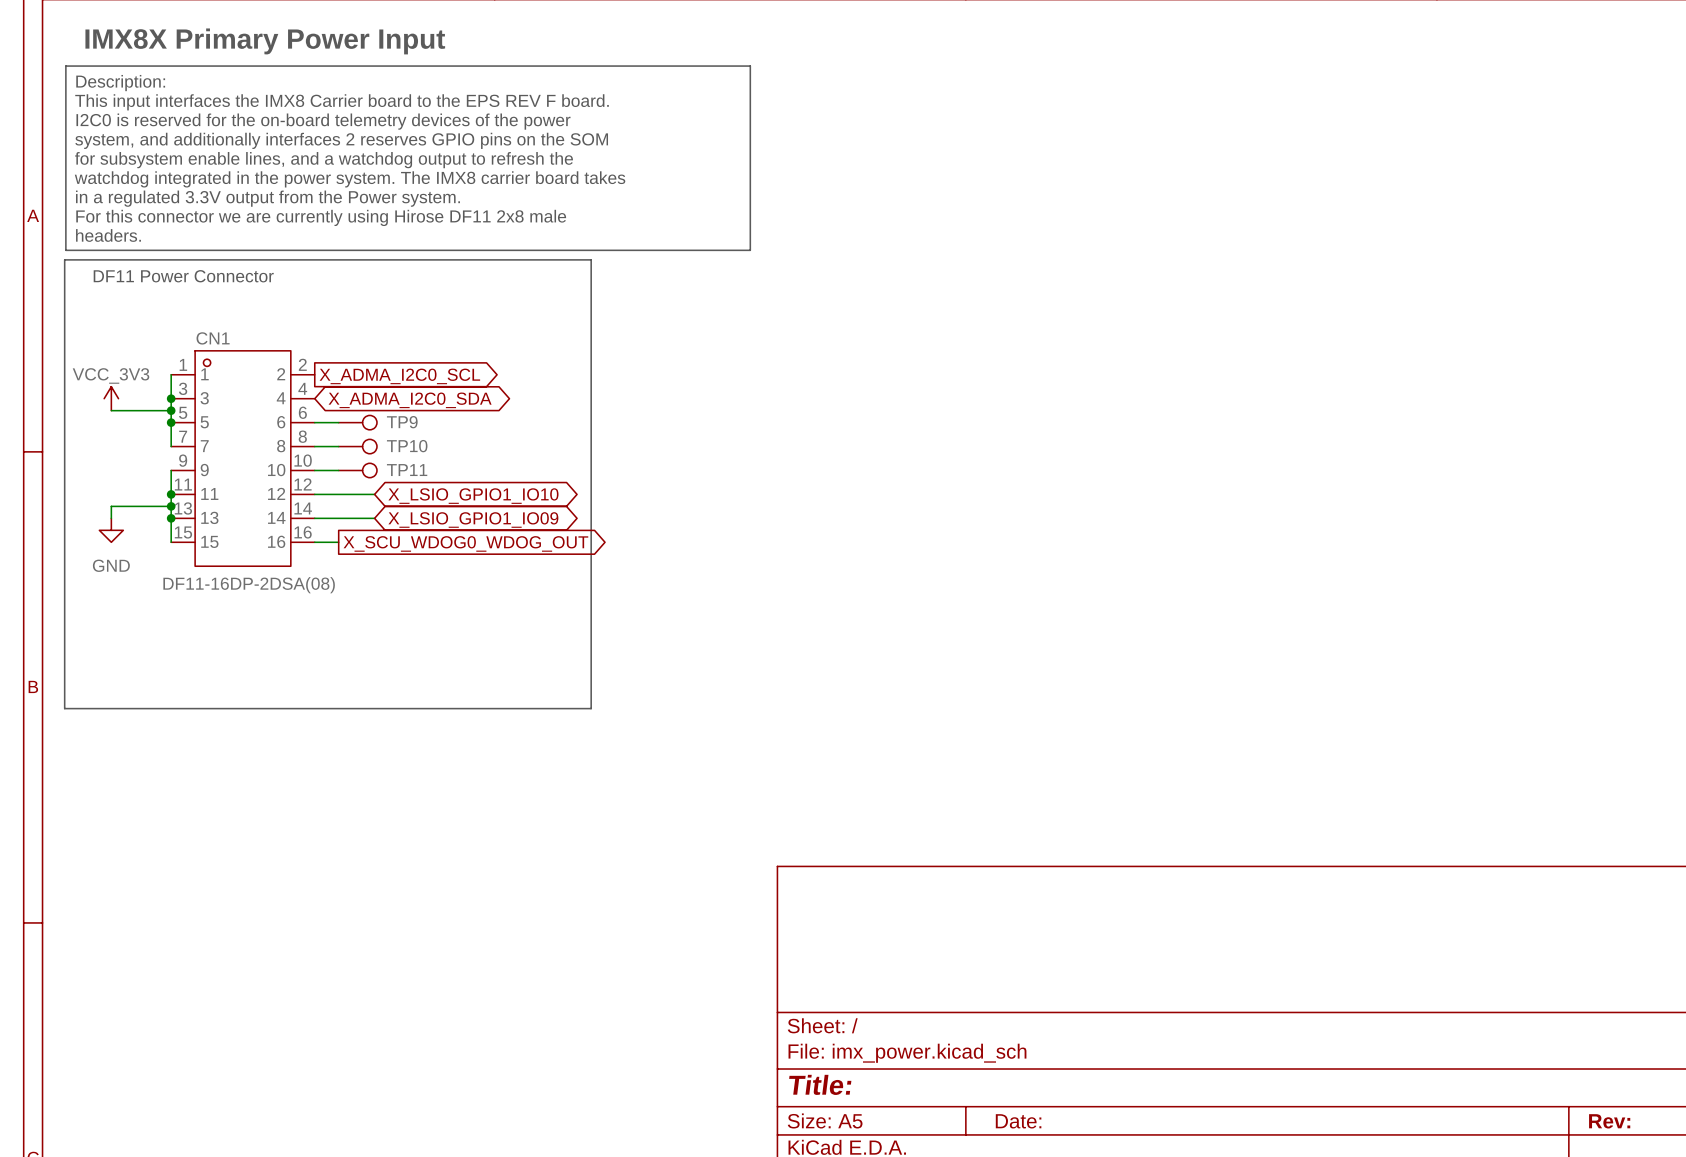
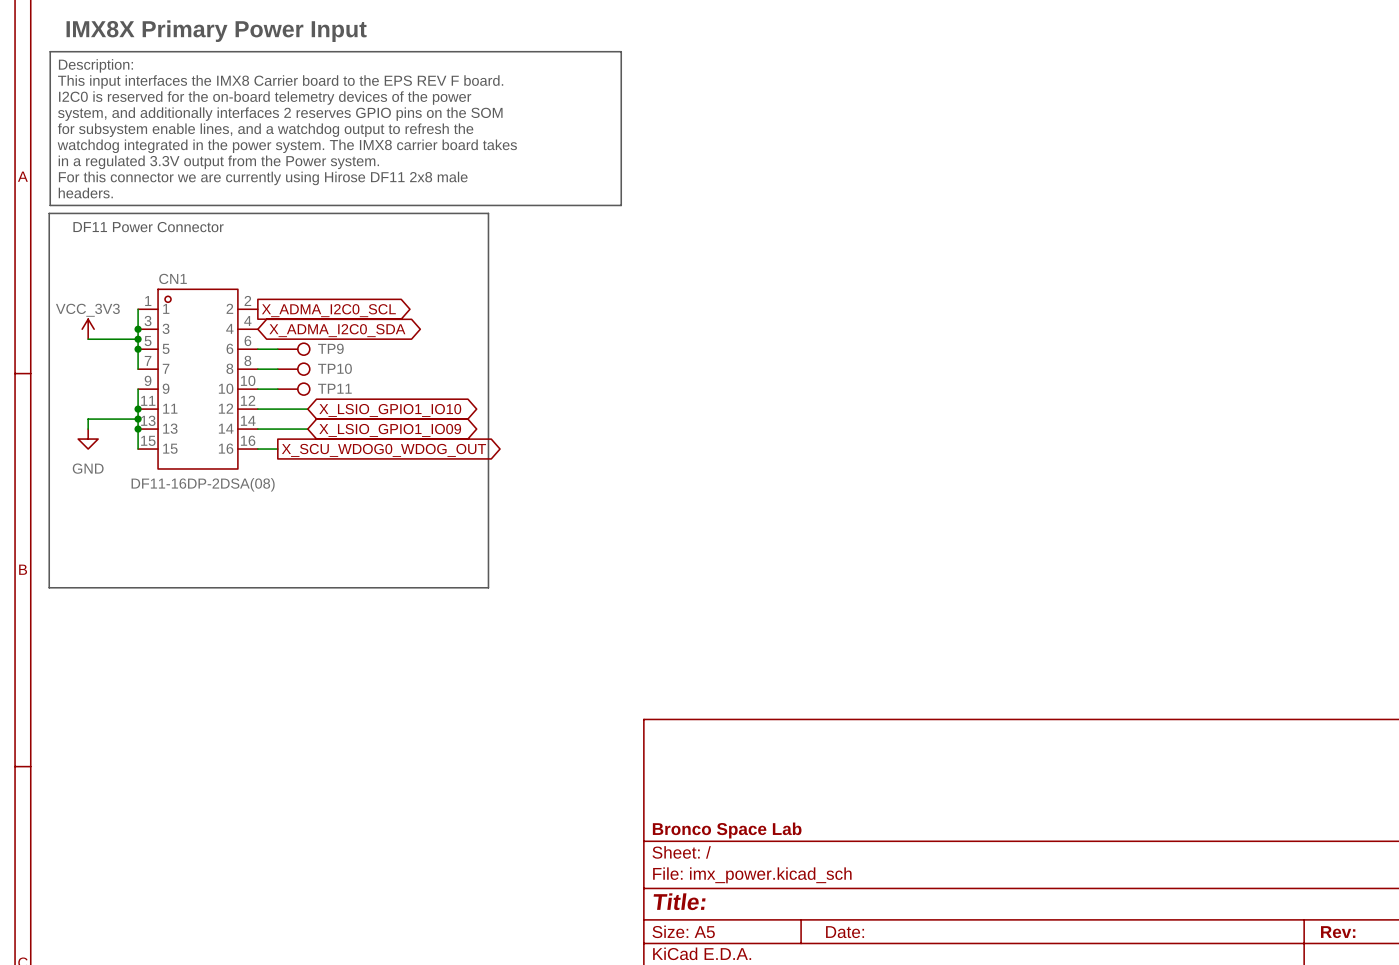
title block: none -> Bronco Space Lab (727, 830)

